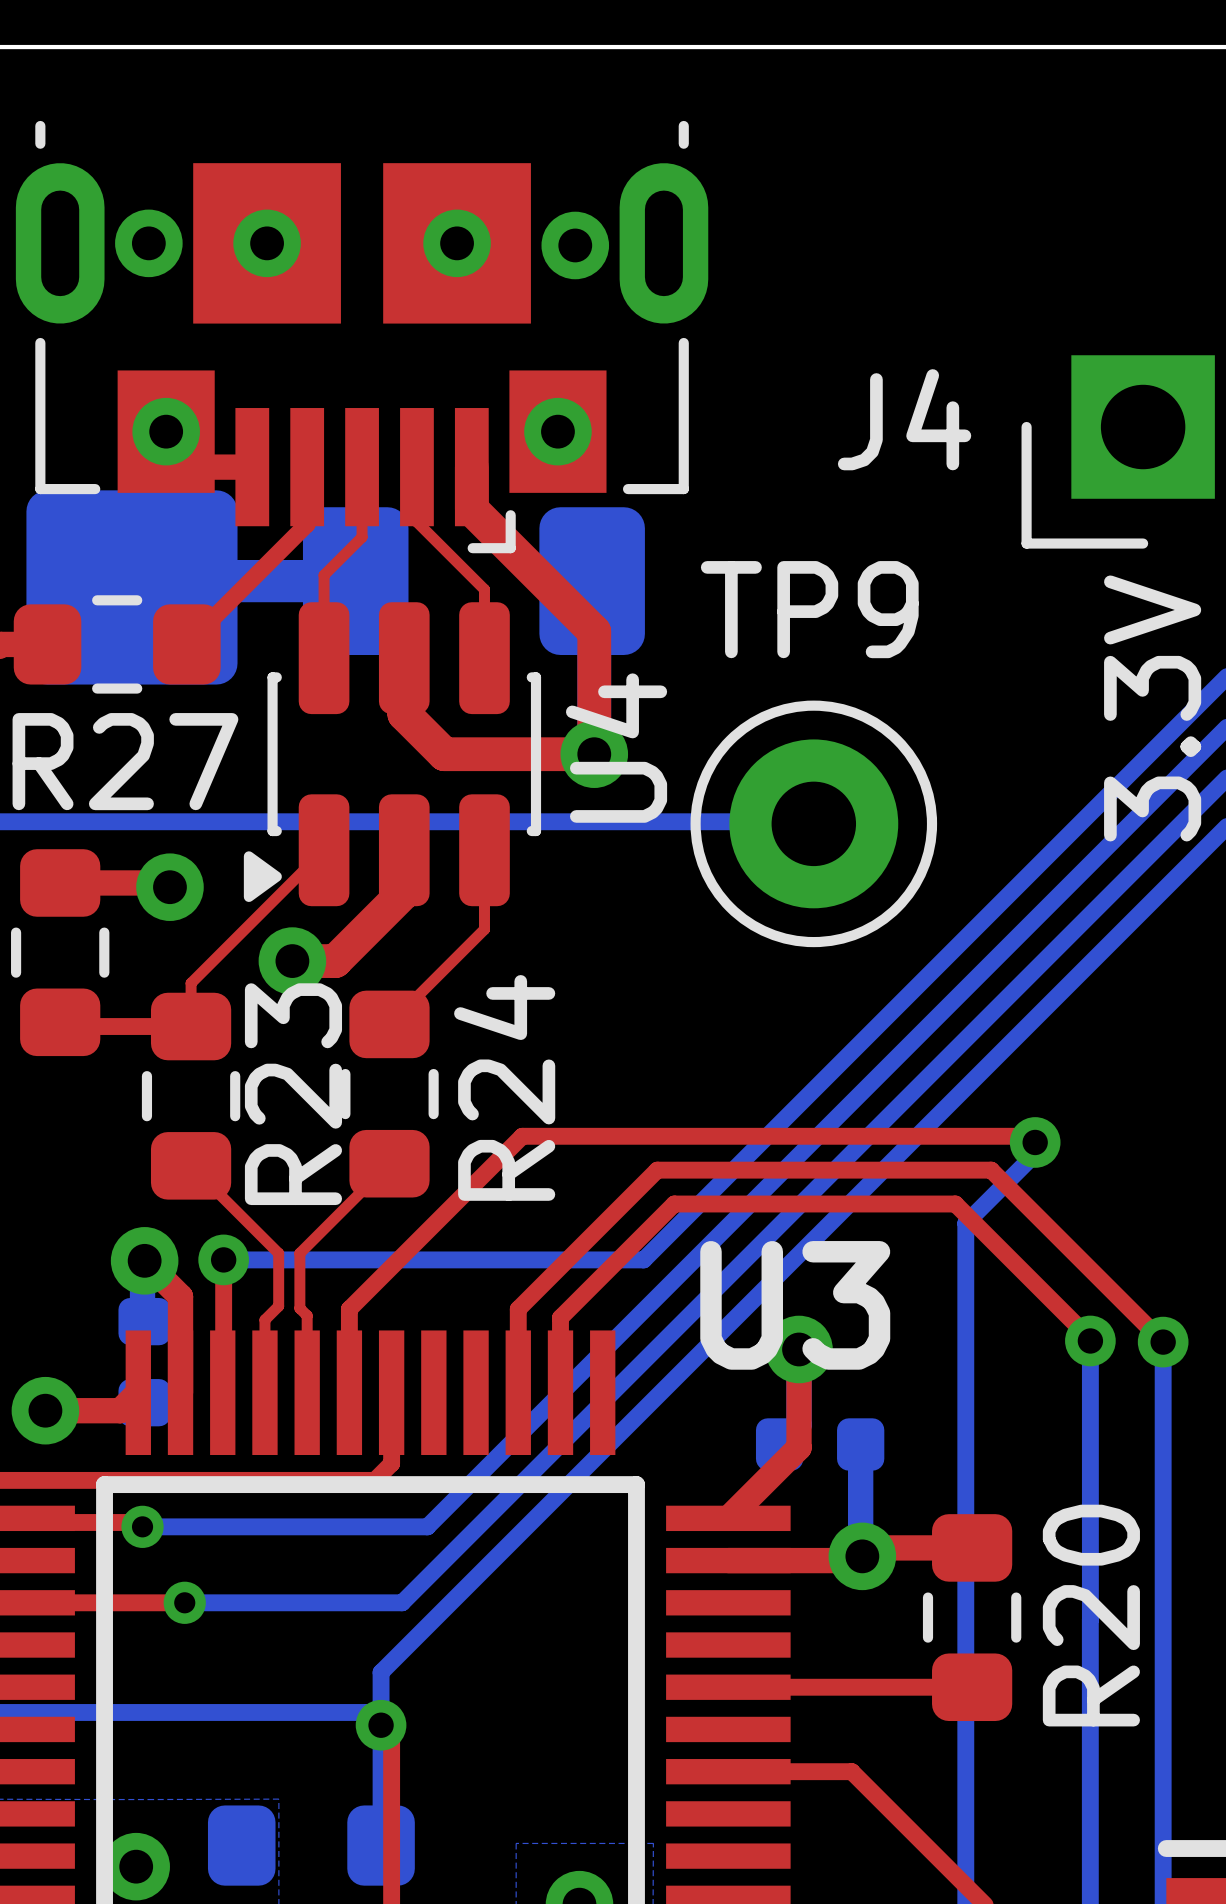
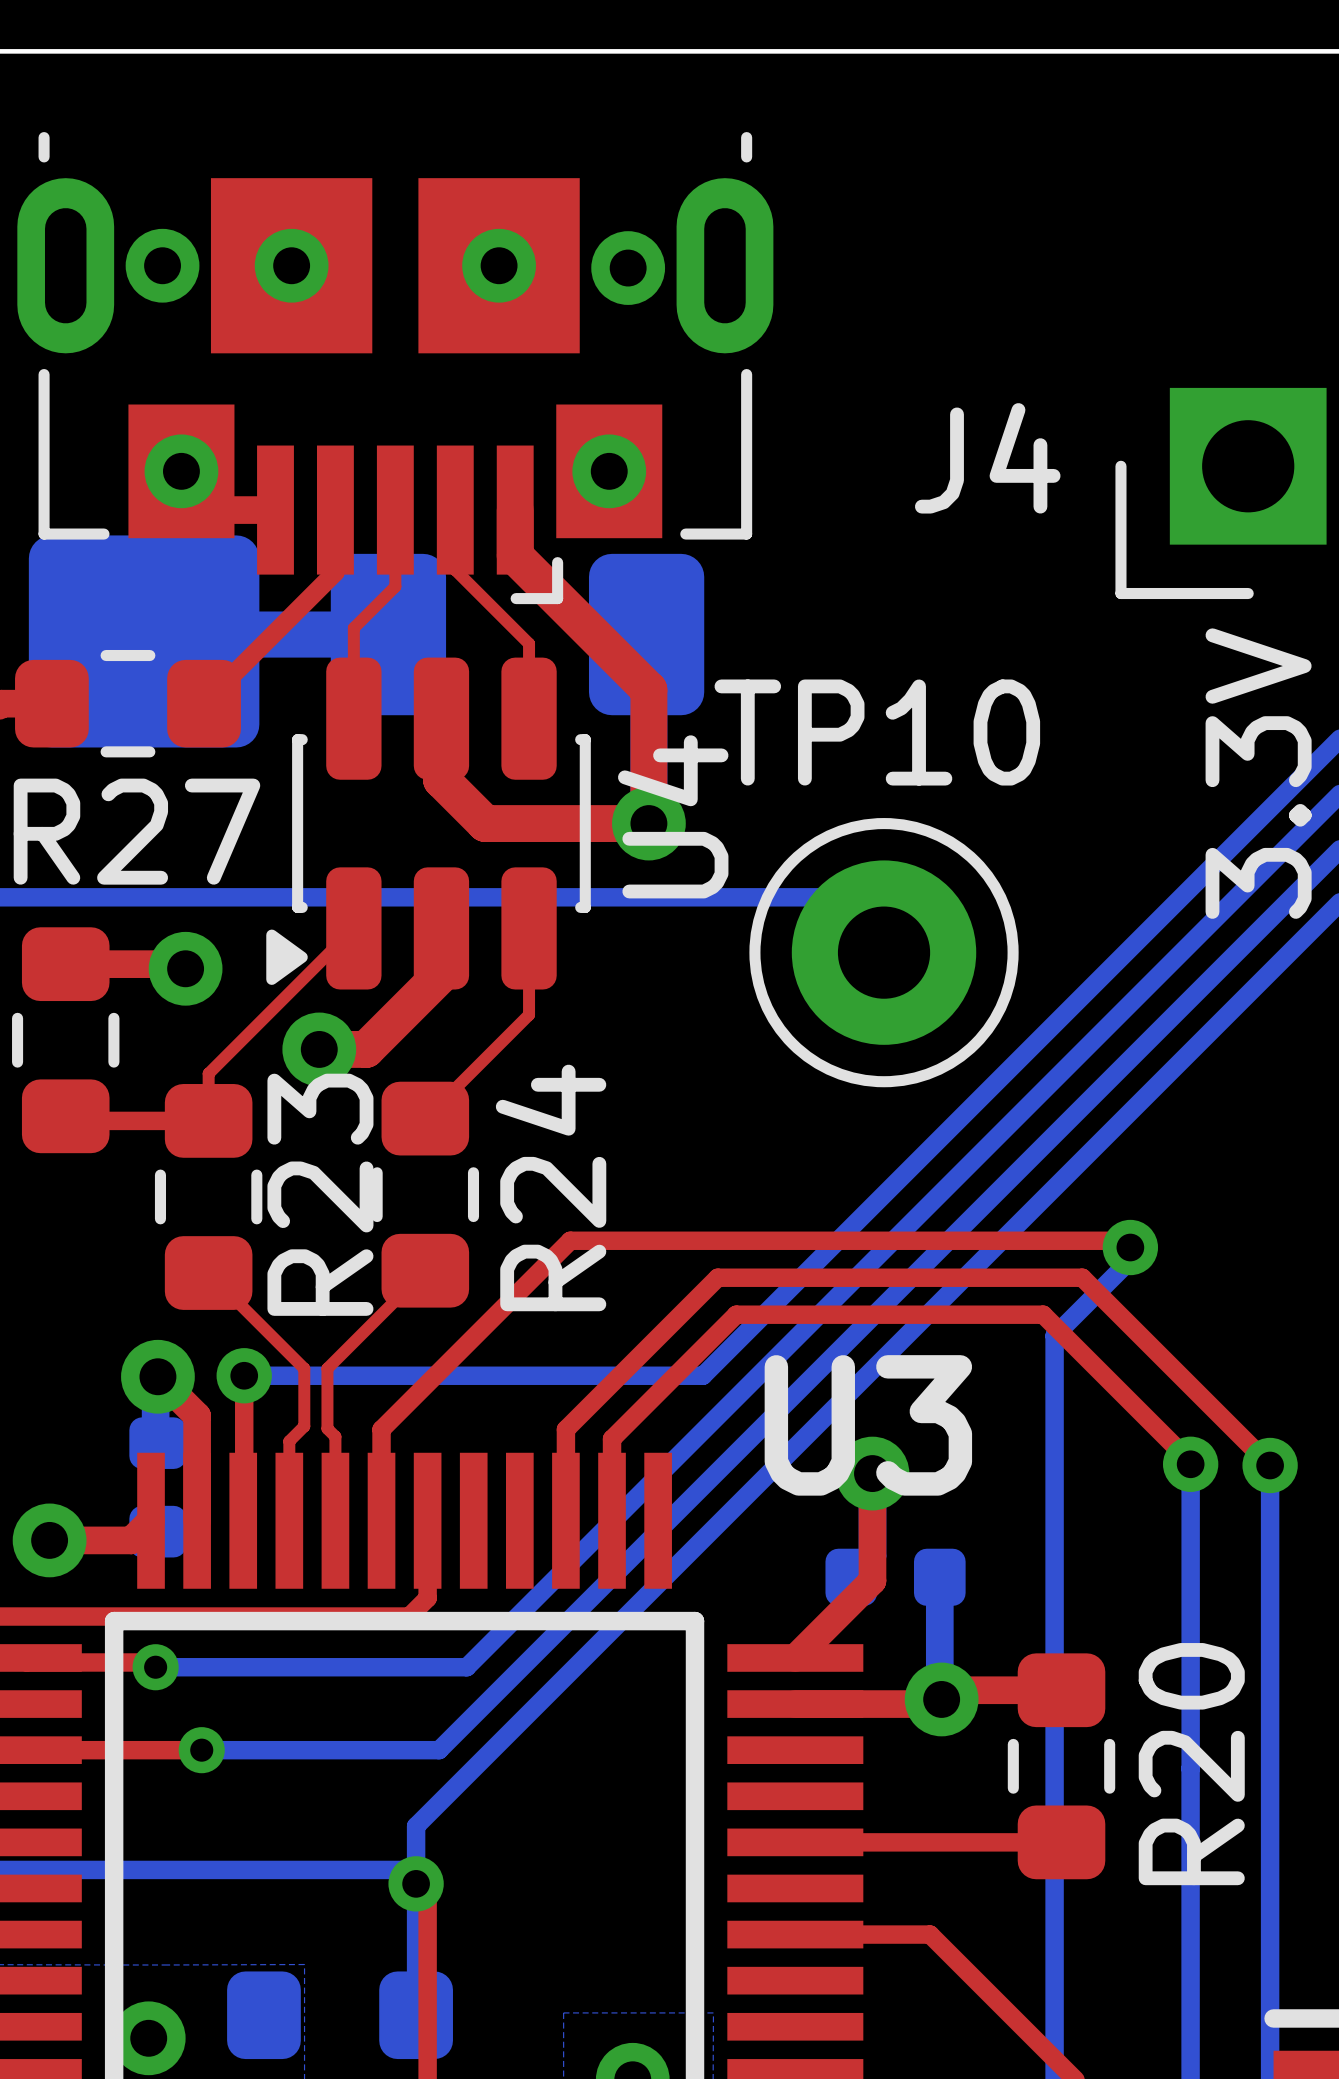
TP9 name: TP9 (809, 609) -> TP10 (877, 732)
TP9 position: (813, 823) -> (884, 952)

